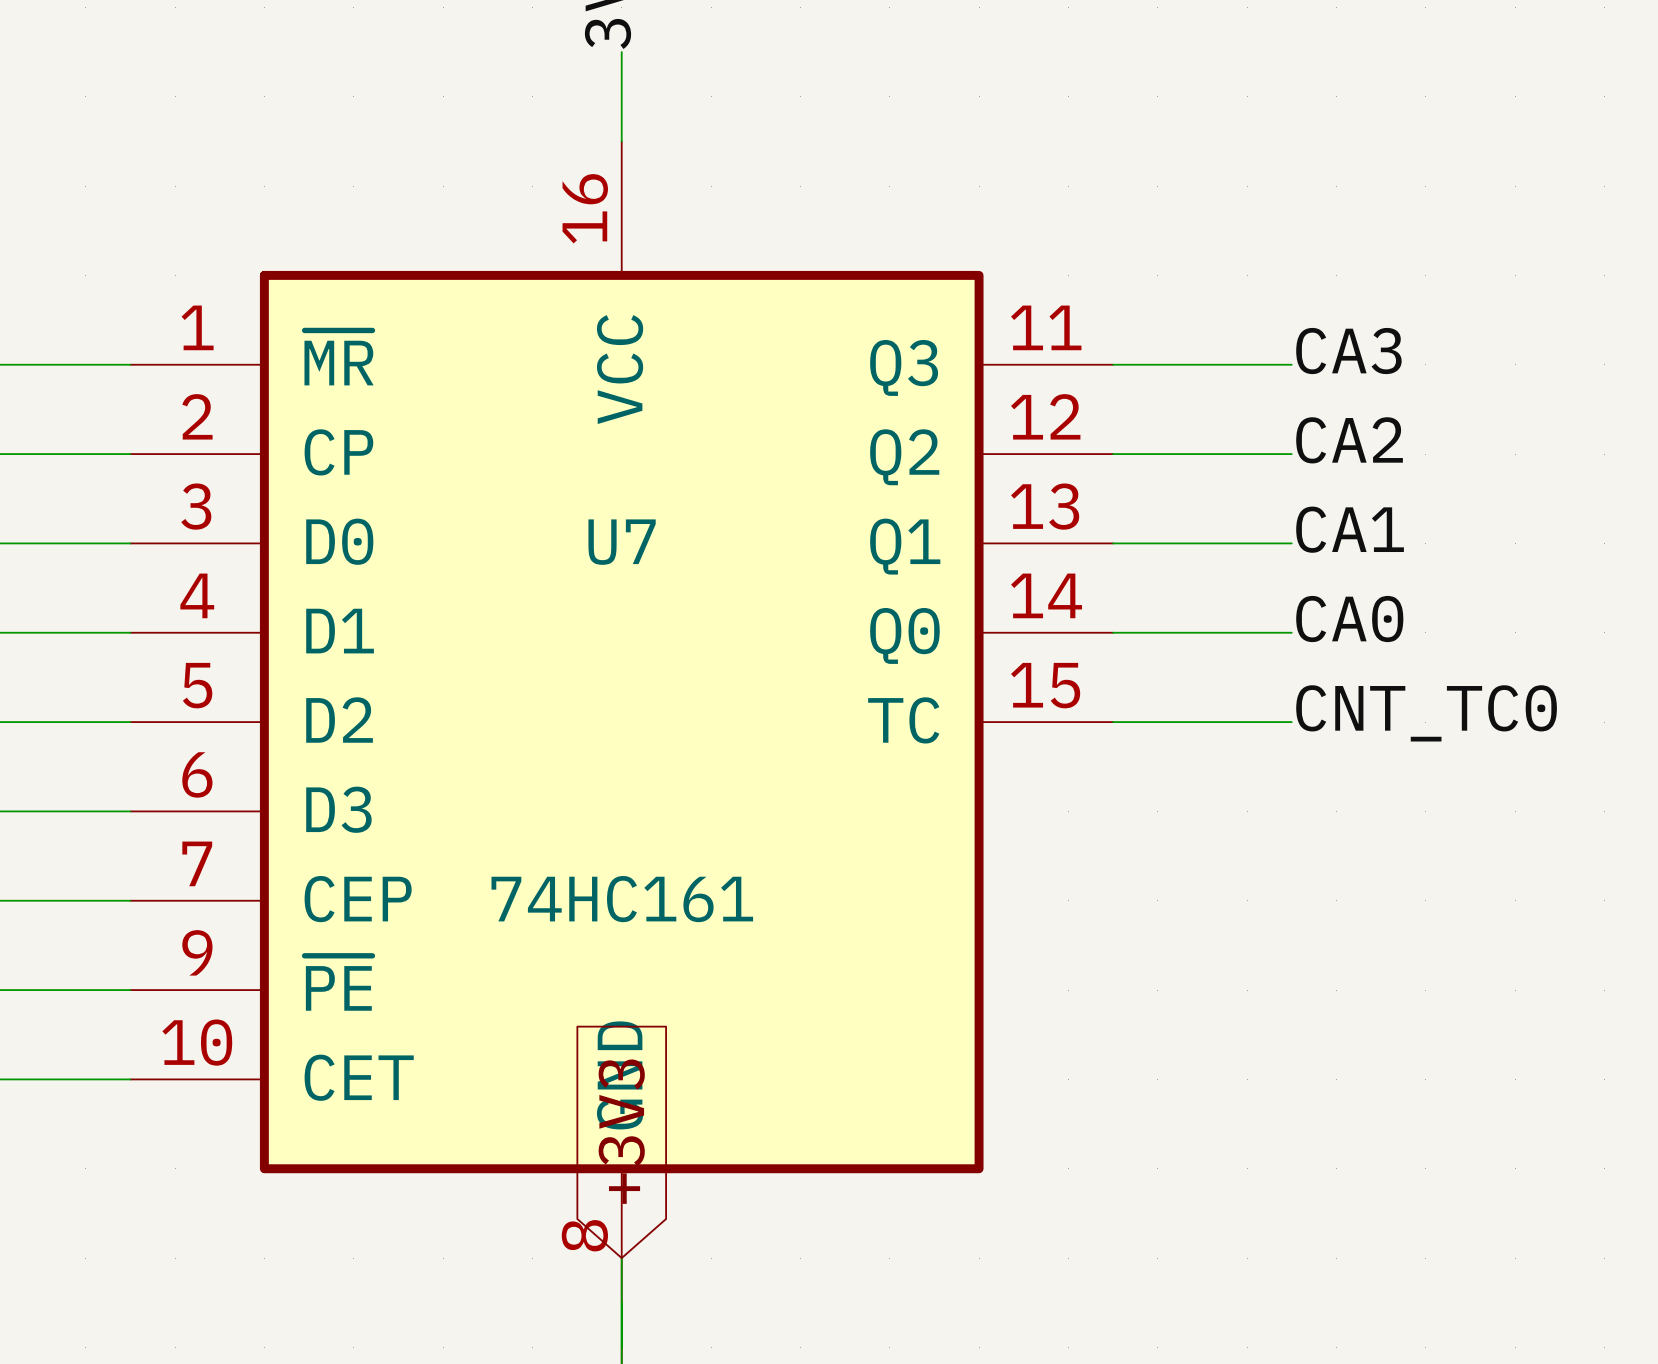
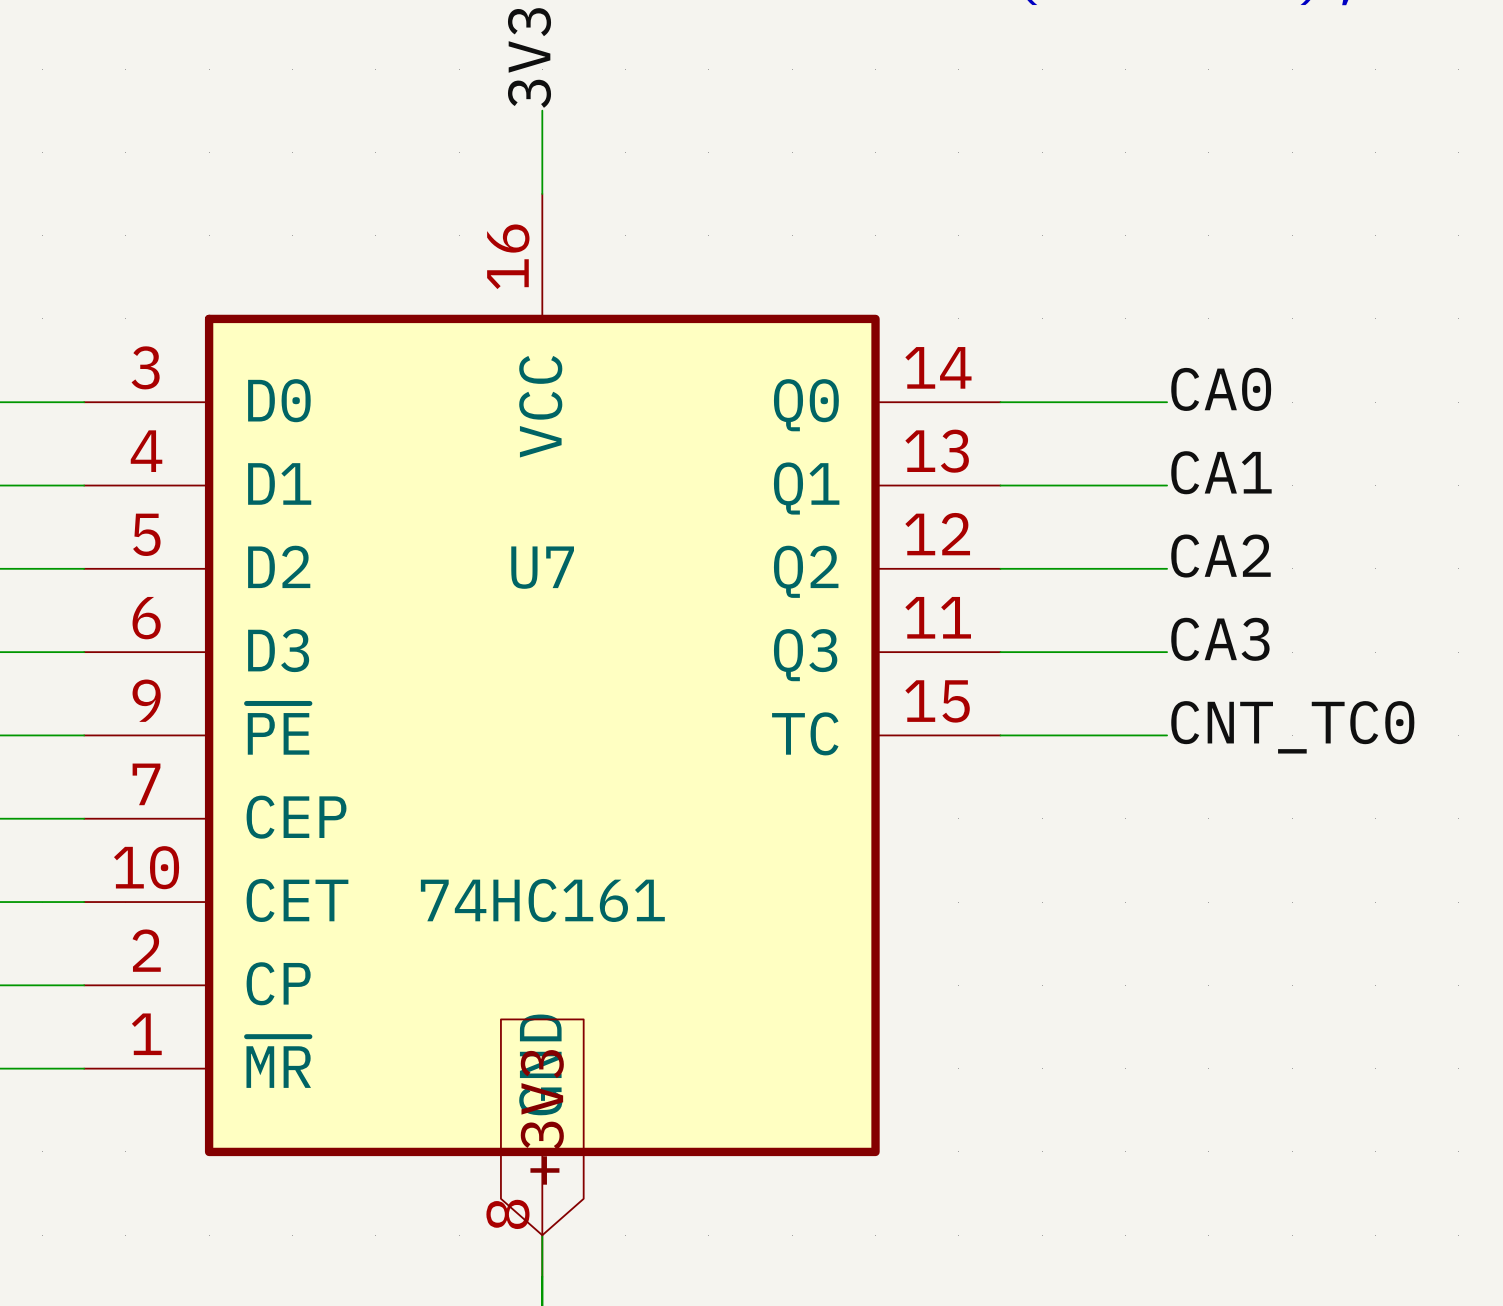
U7 symbol: [130, 141, 1114, 1303] -> [84, 193, 1001, 1277]
label: CA3 (1348, 351) -> CA0 (1221, 389)
label: CA2 (1349, 440) -> CA1 (1221, 472)
label: CA1 (1350, 529) -> CA2 (1220, 556)
label: CA0 (1349, 619) -> CA3 (1220, 639)

